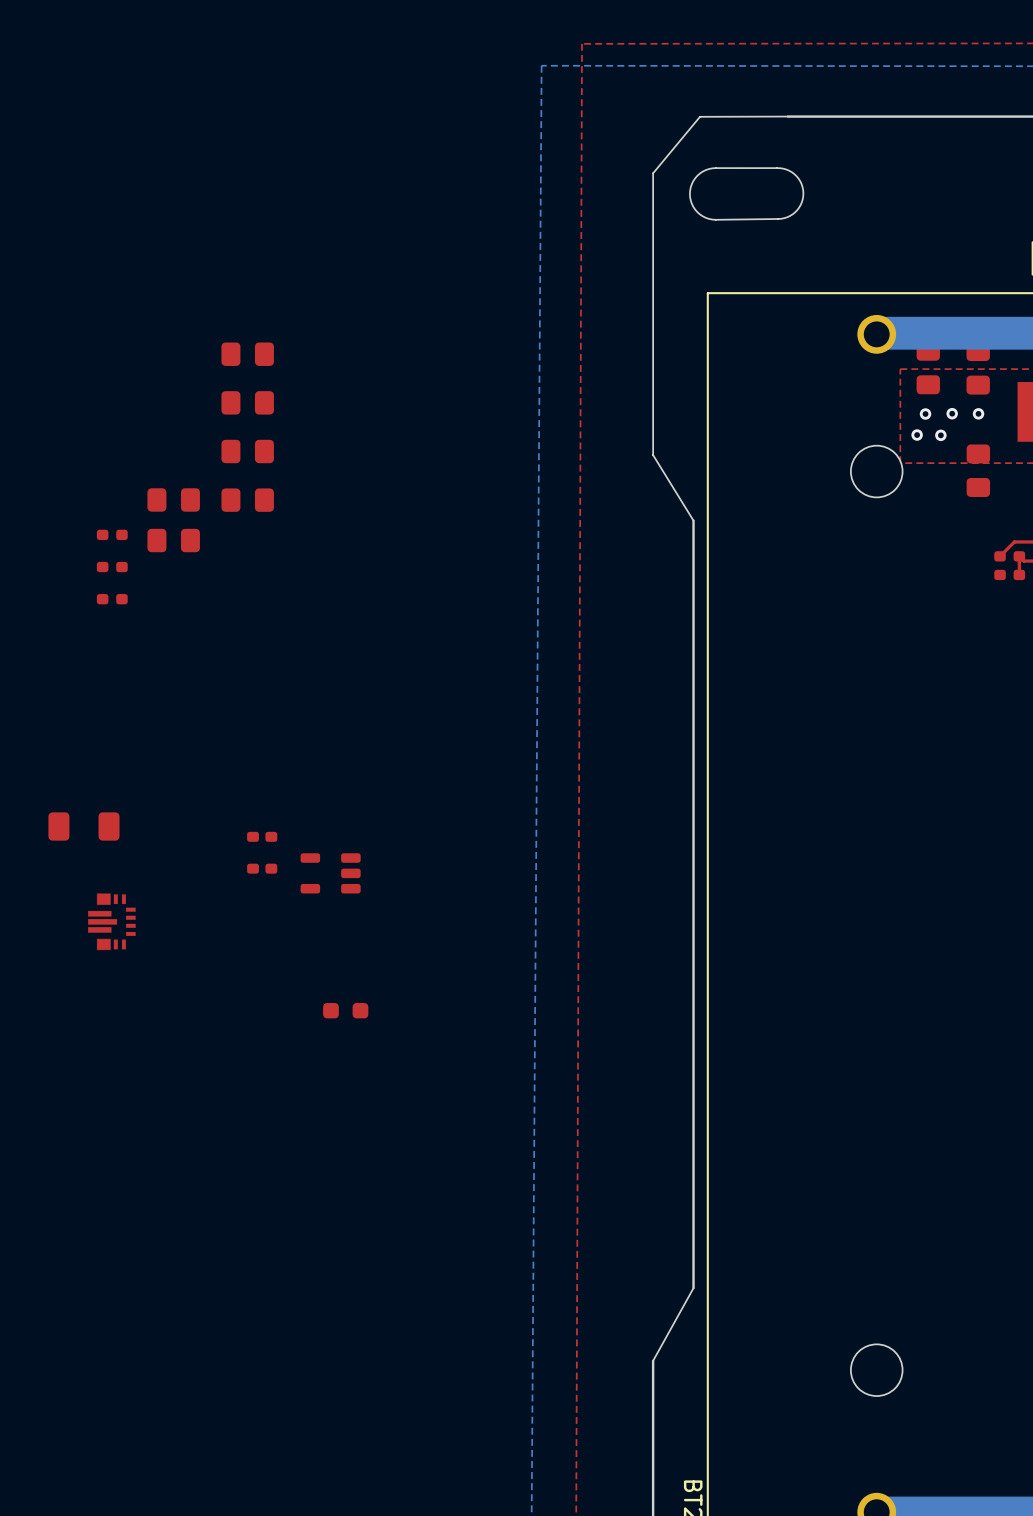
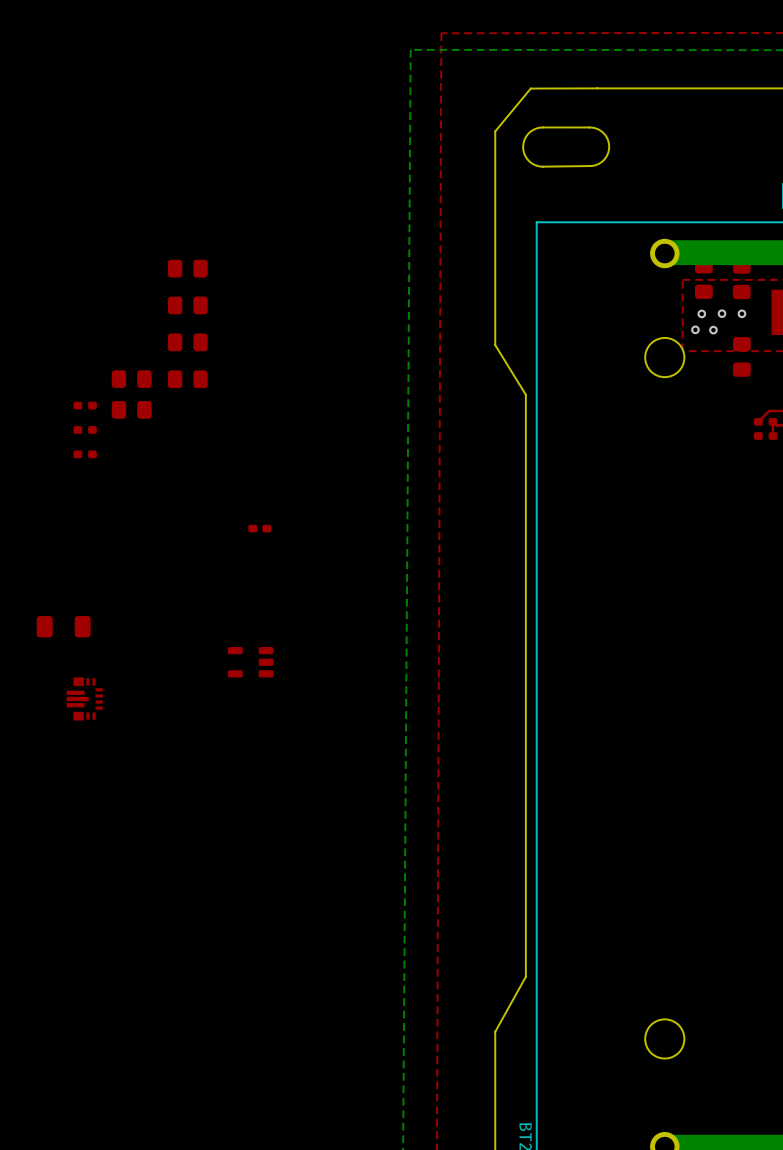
part: none -> (259, 528)
part: (262, 836) -> none
part: (262, 868) -> none
part: (345, 1010) -> none

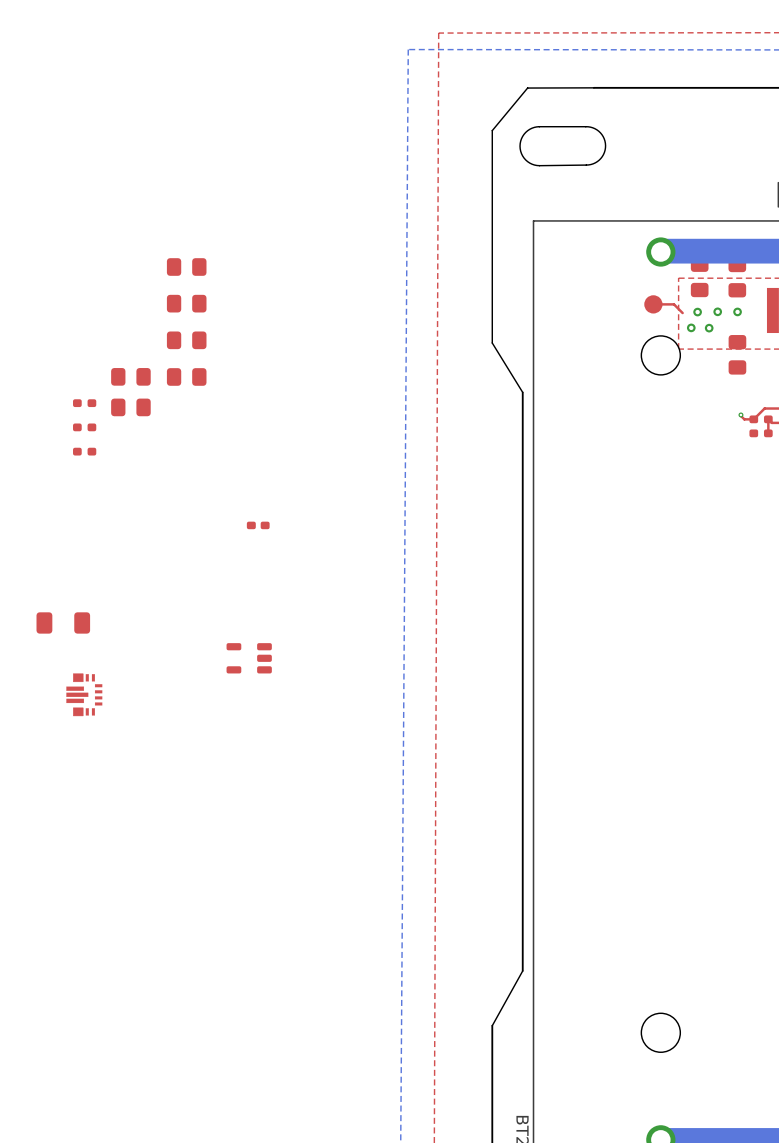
top track: none -> (653, 304) (673, 304) (682, 313)
part: none -> (653, 304)
top track: none -> (740, 414) (744, 419) (753, 419)
via: none -> (740, 414)

